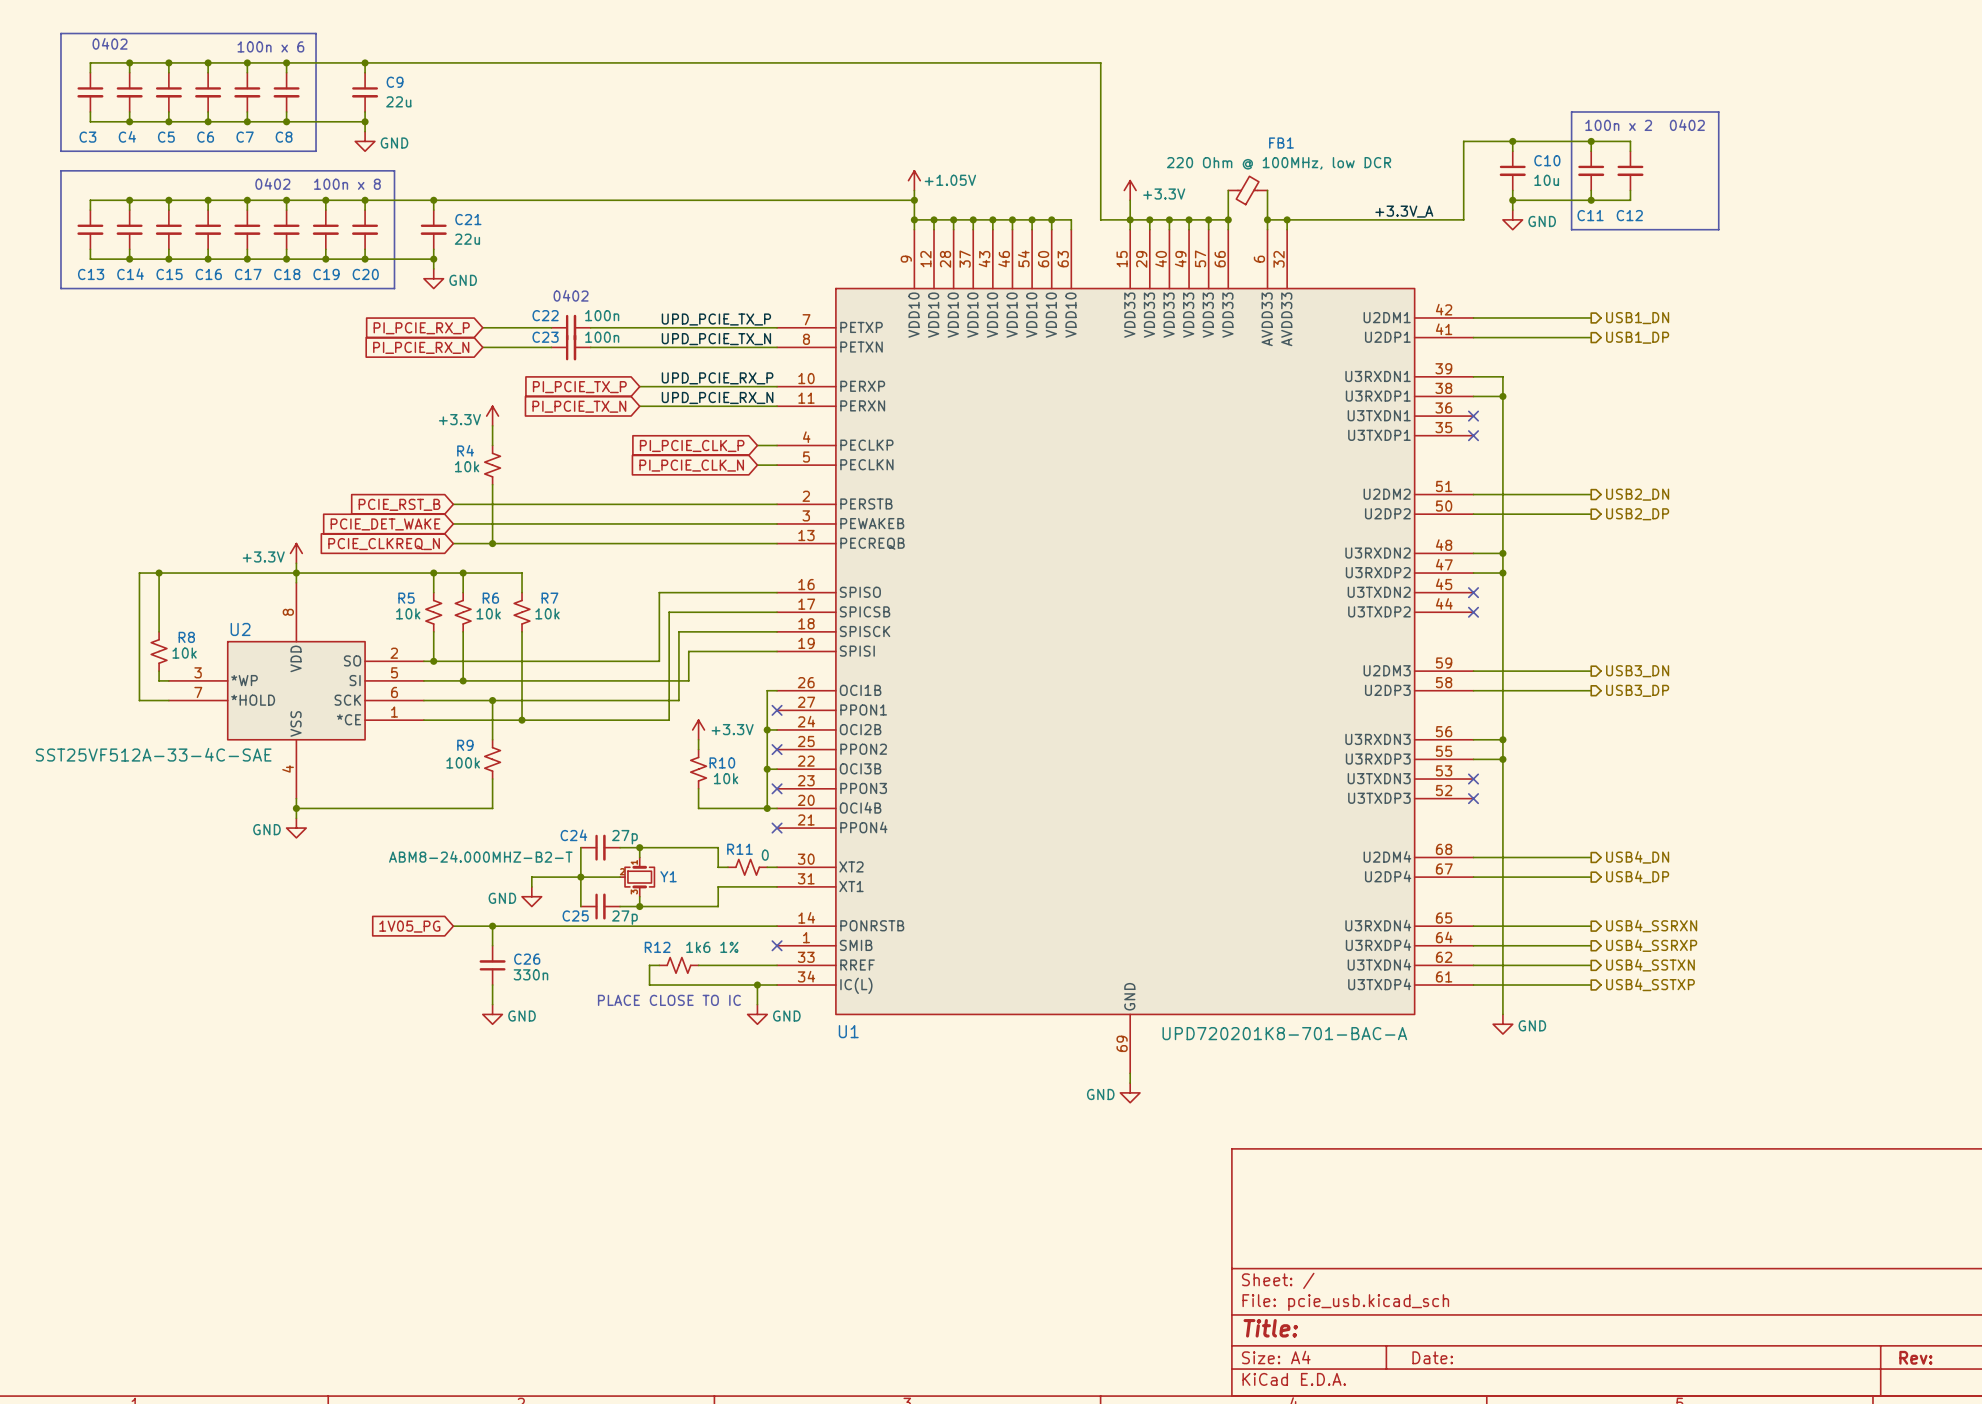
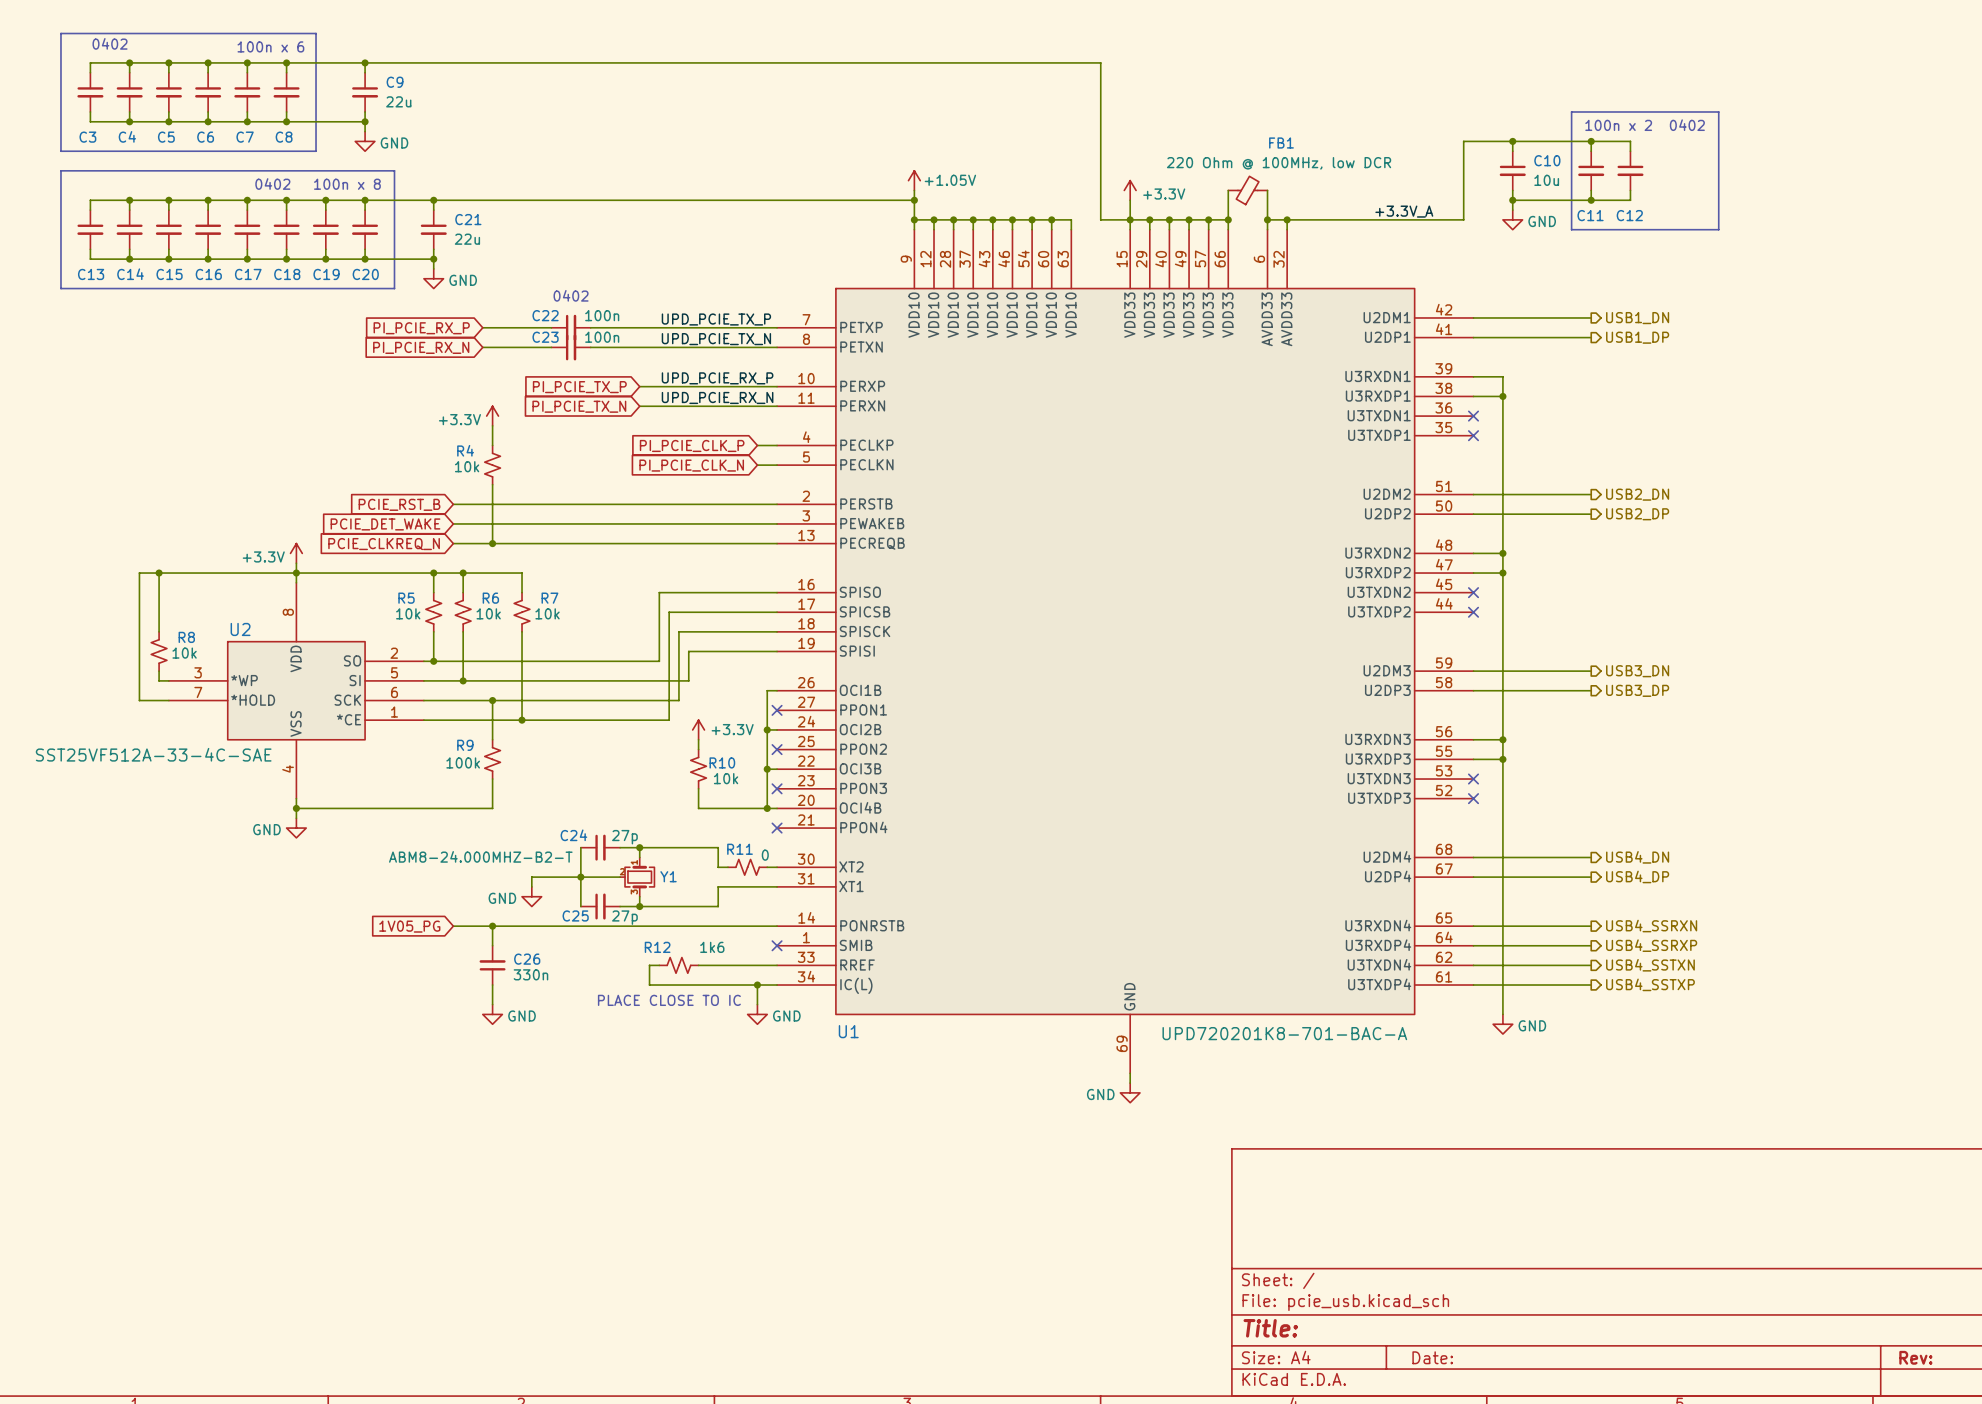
R12 value: 1k6 1% (712, 947) -> 1k6 (712, 947)

